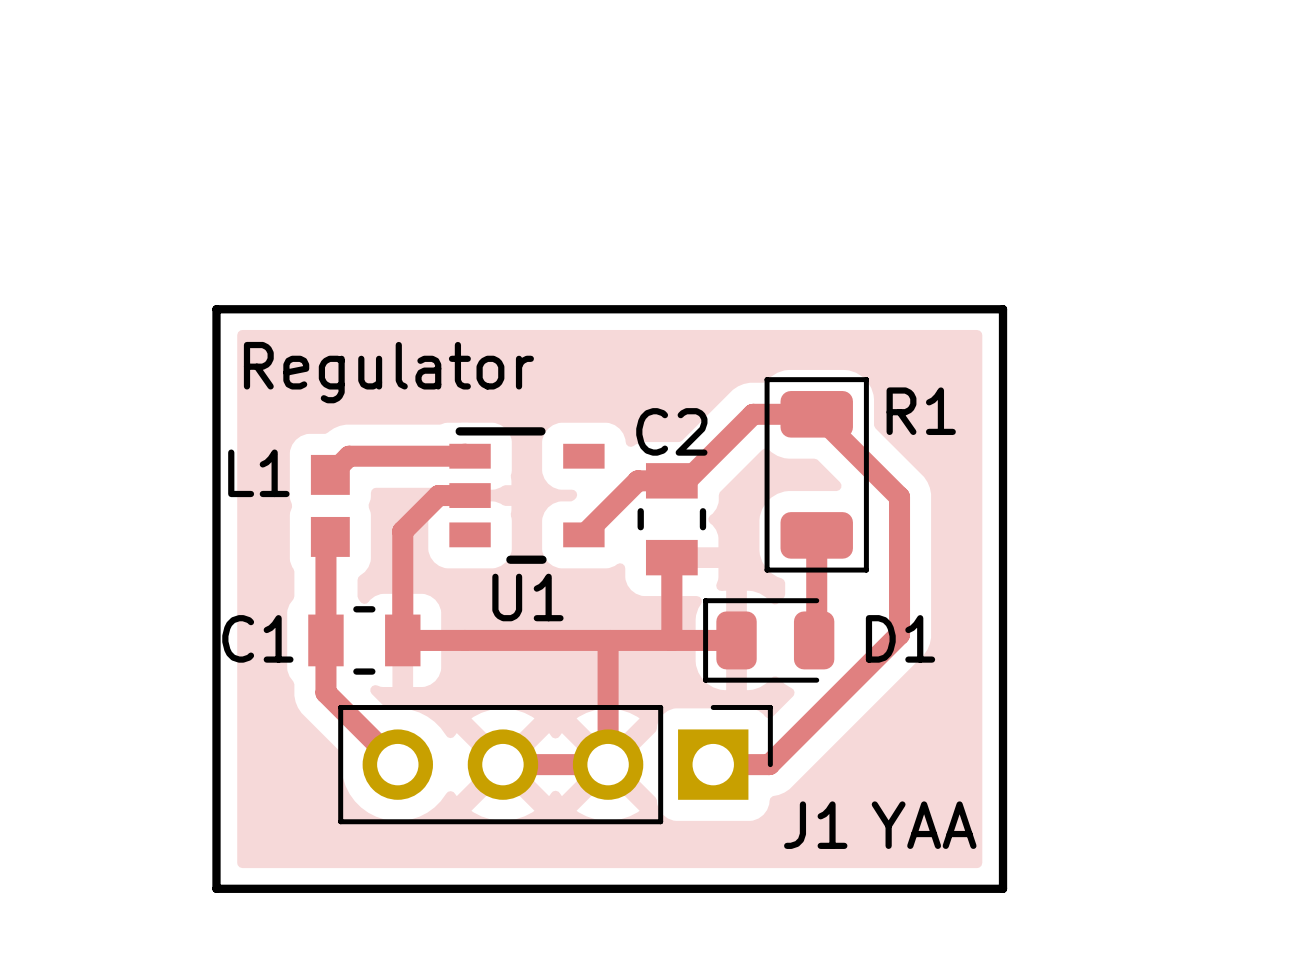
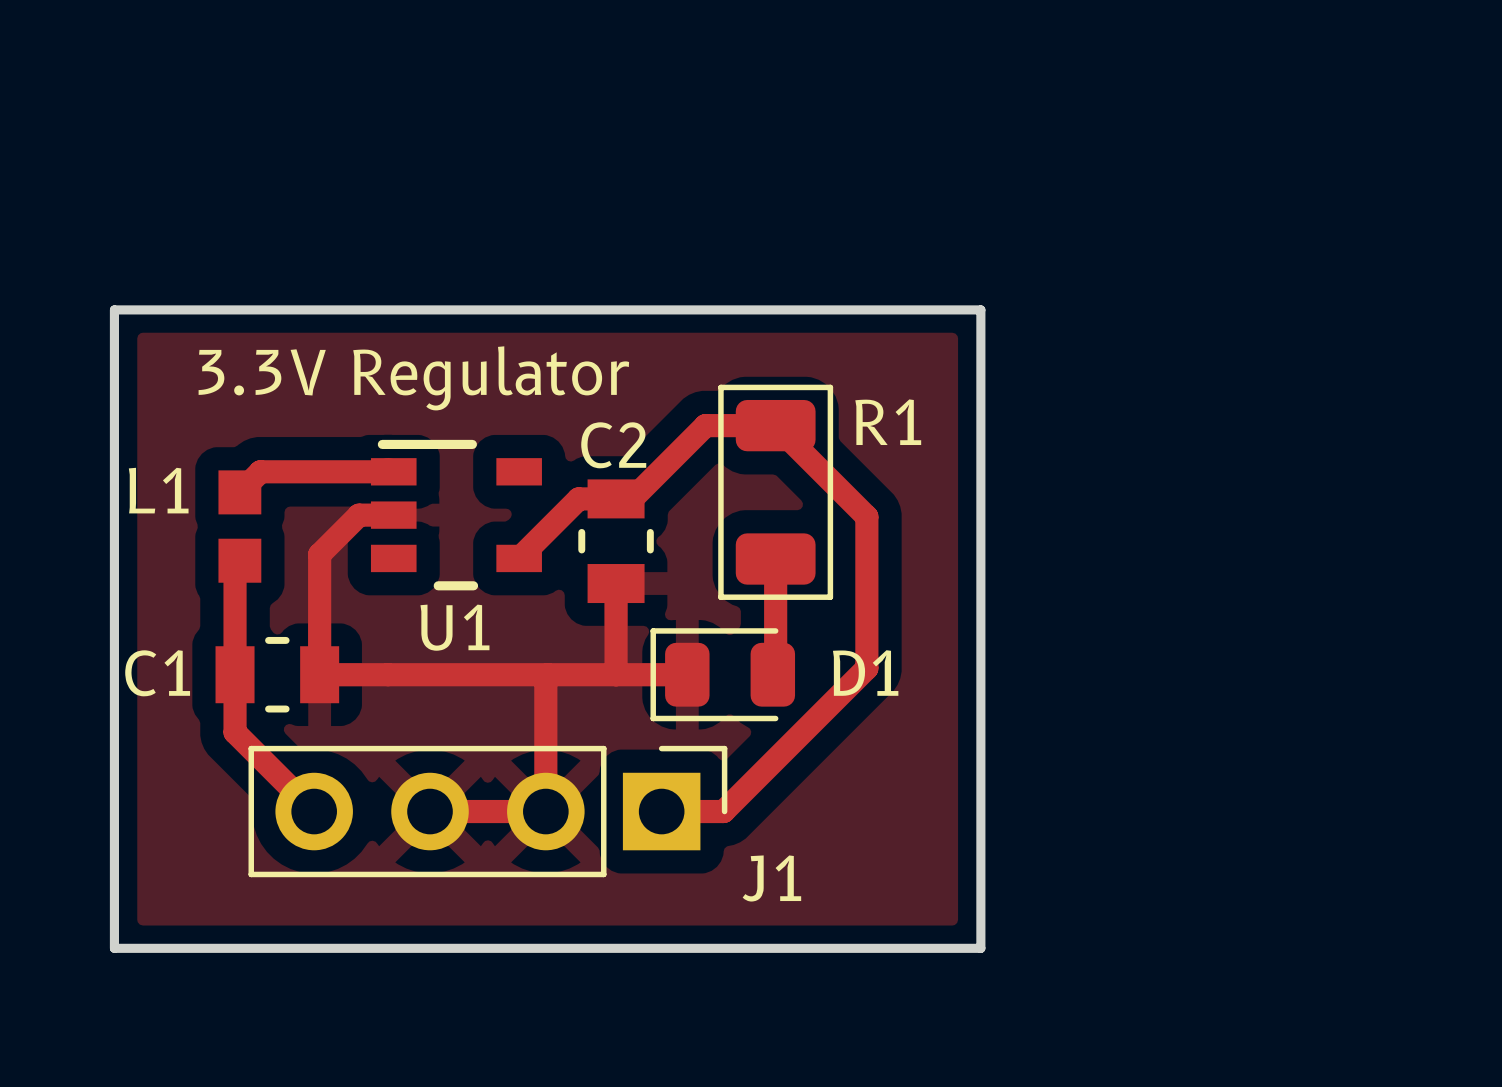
U1 text: Regulator (388, 372) -> none
U1 text: none -> 3.3V Regulator (413, 378)
text: YAA (924, 825) -> none

